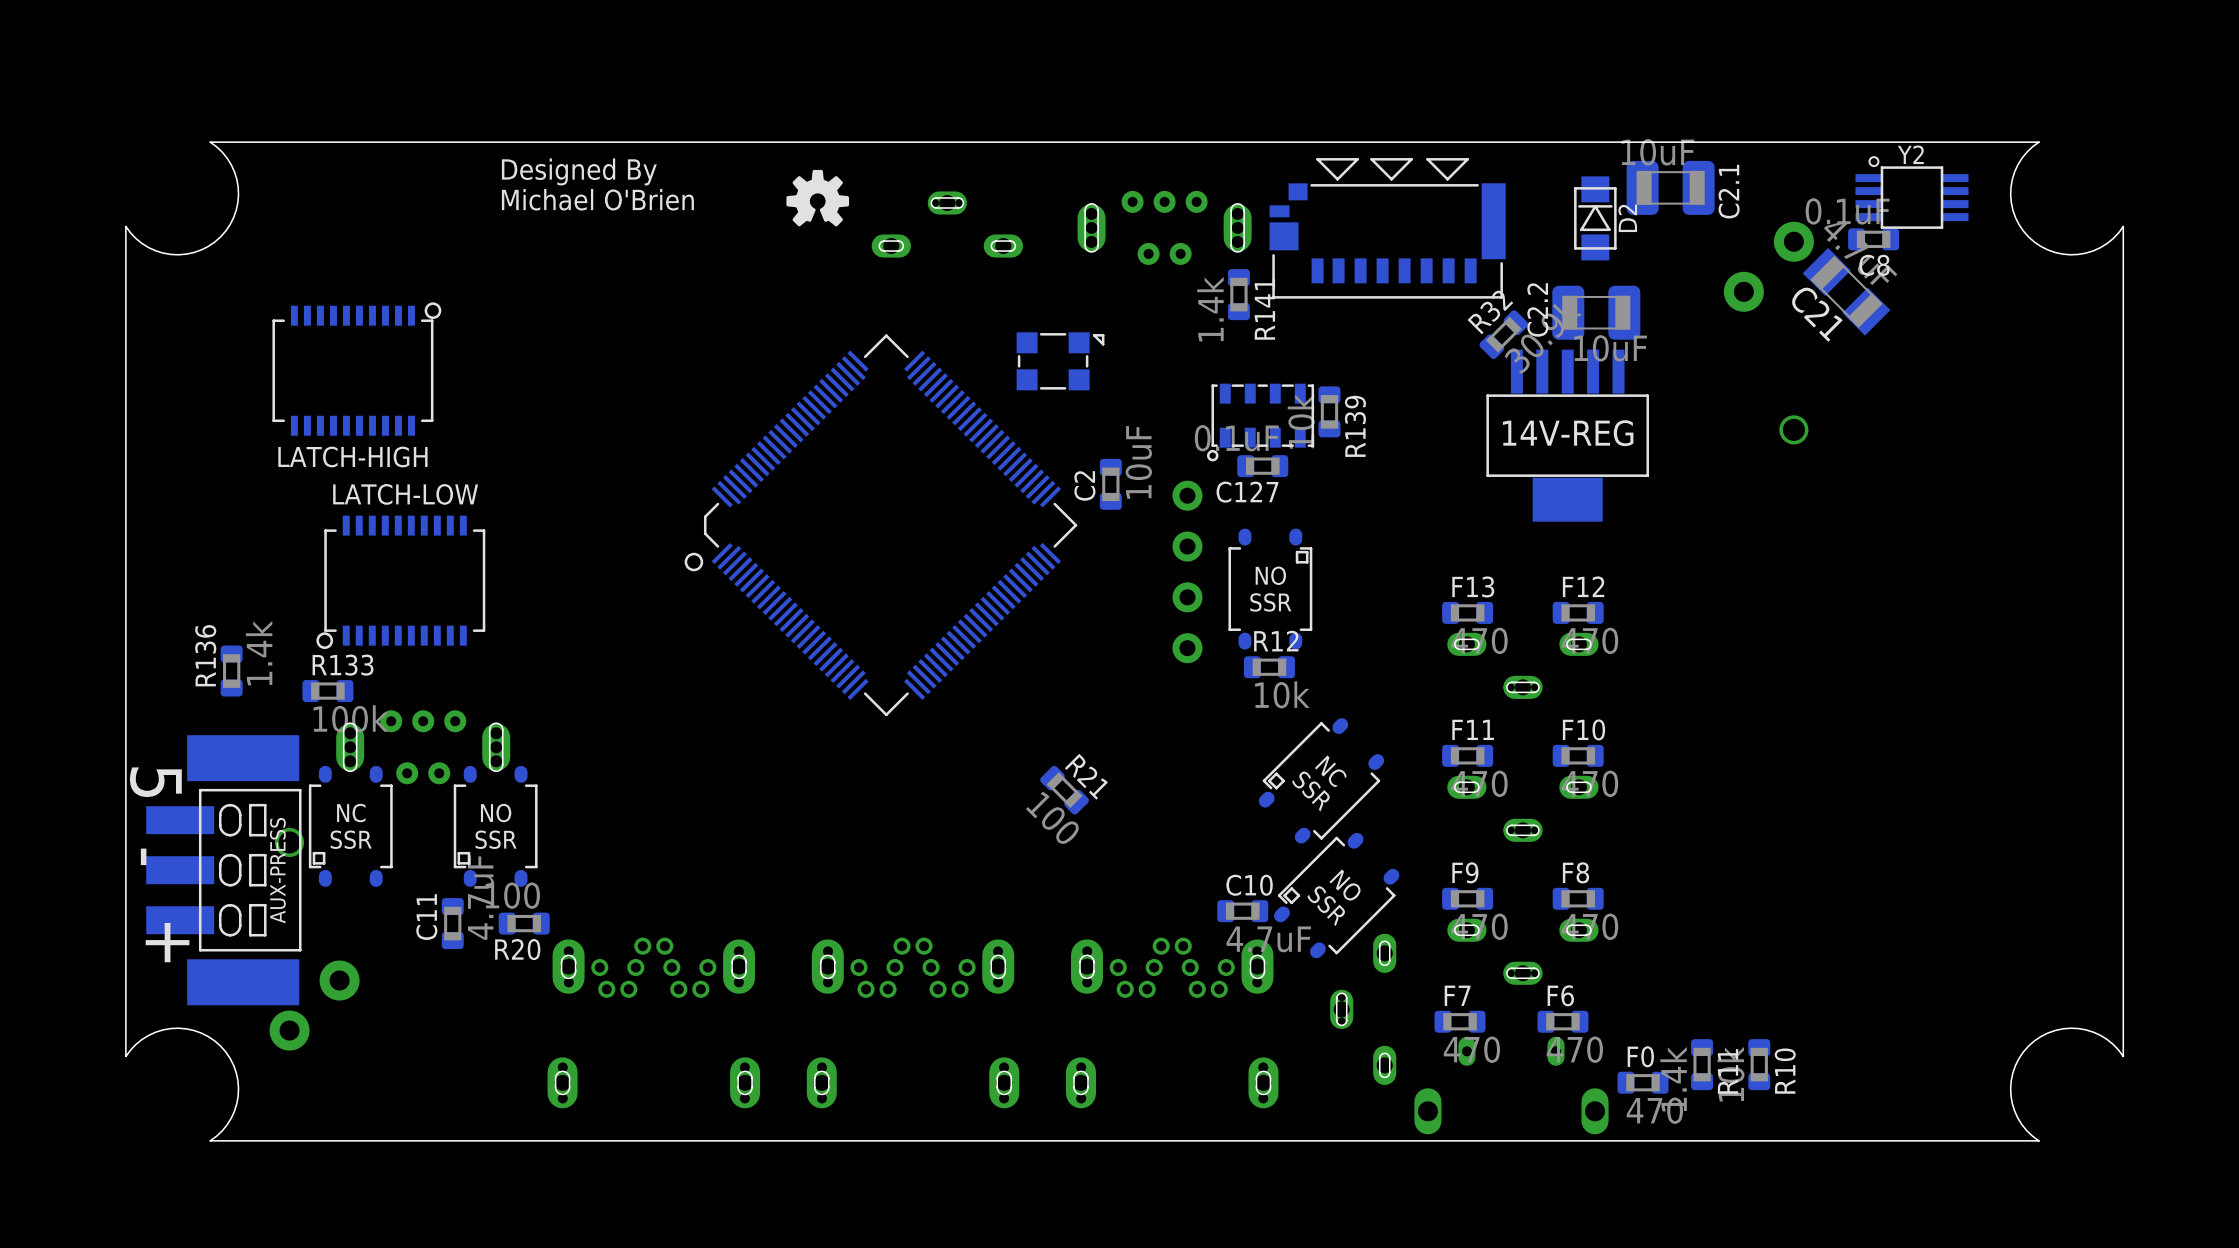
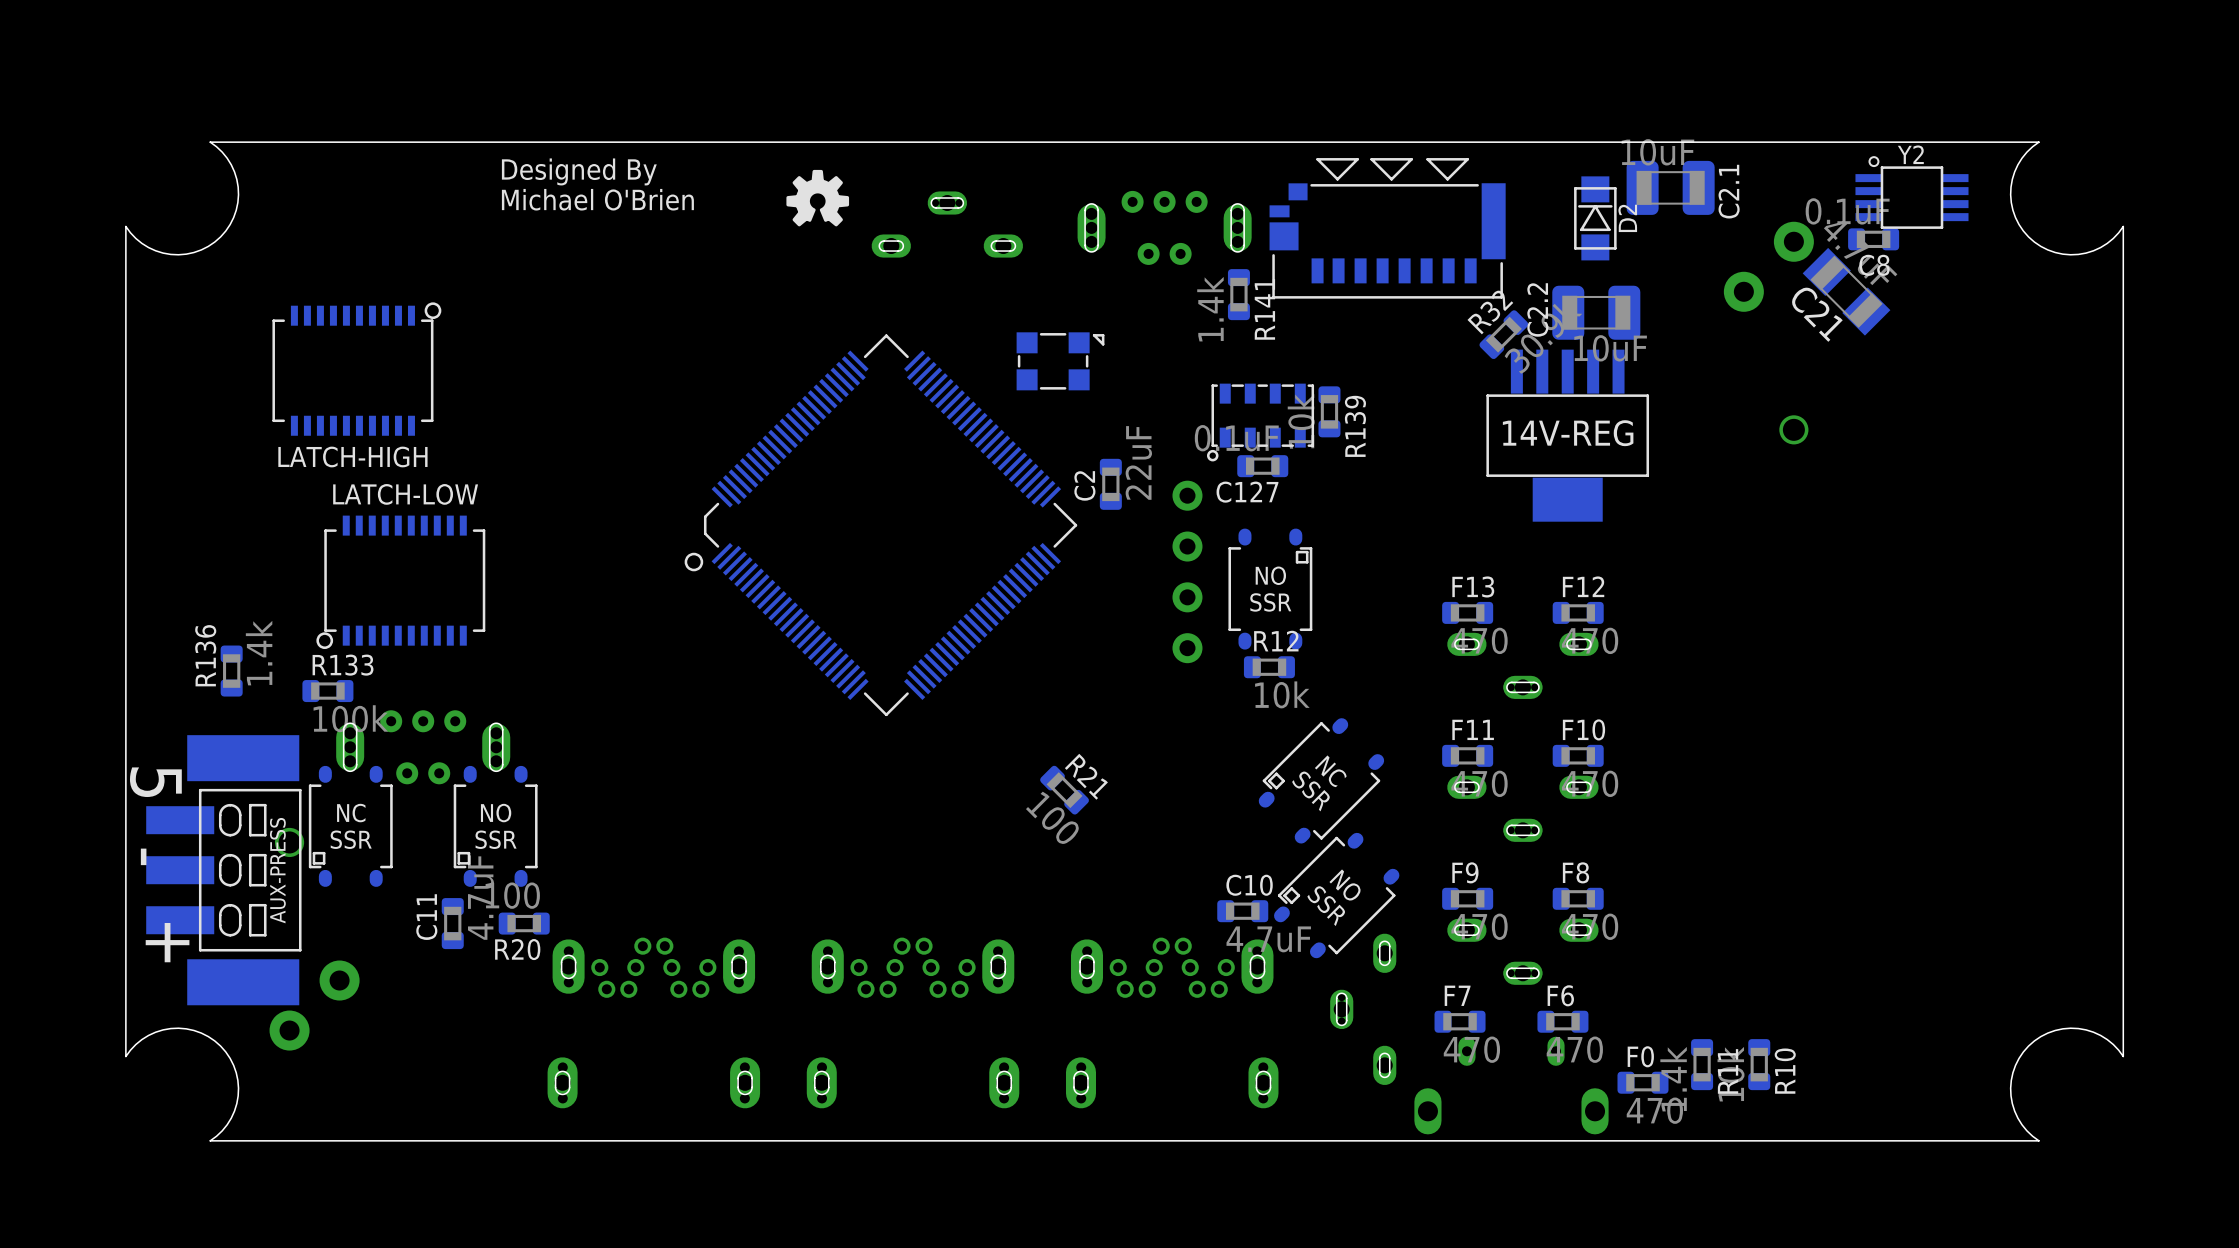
C2 value: 10uF (1138, 462) -> 22uF (1138, 462)

